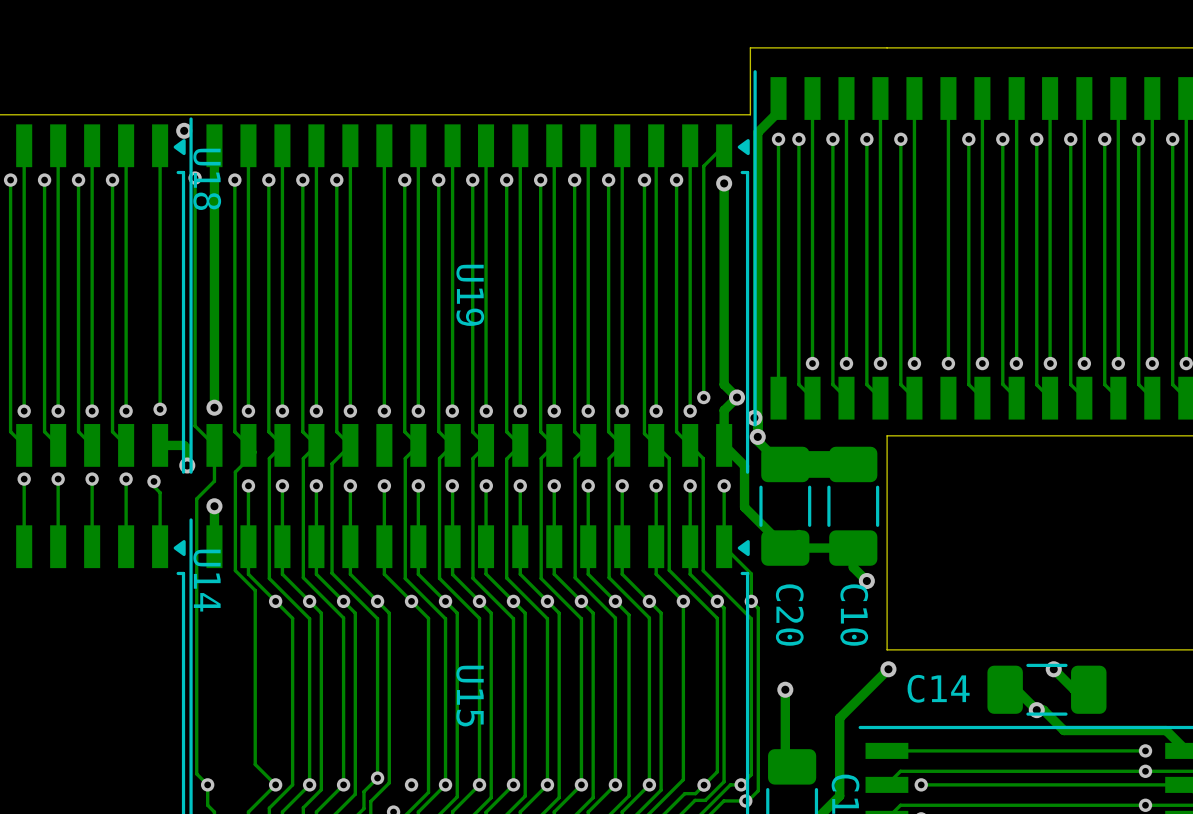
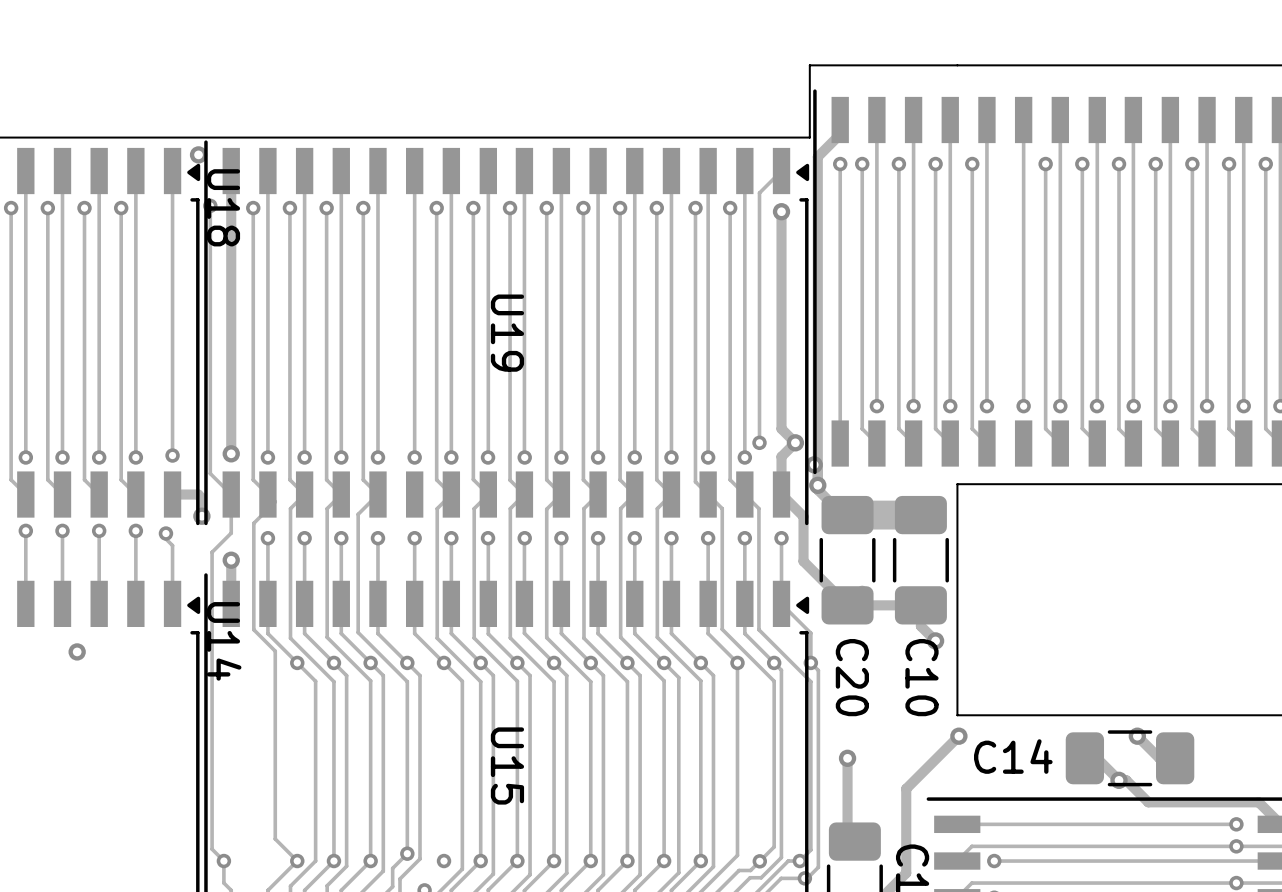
via: none -> (77, 651)

